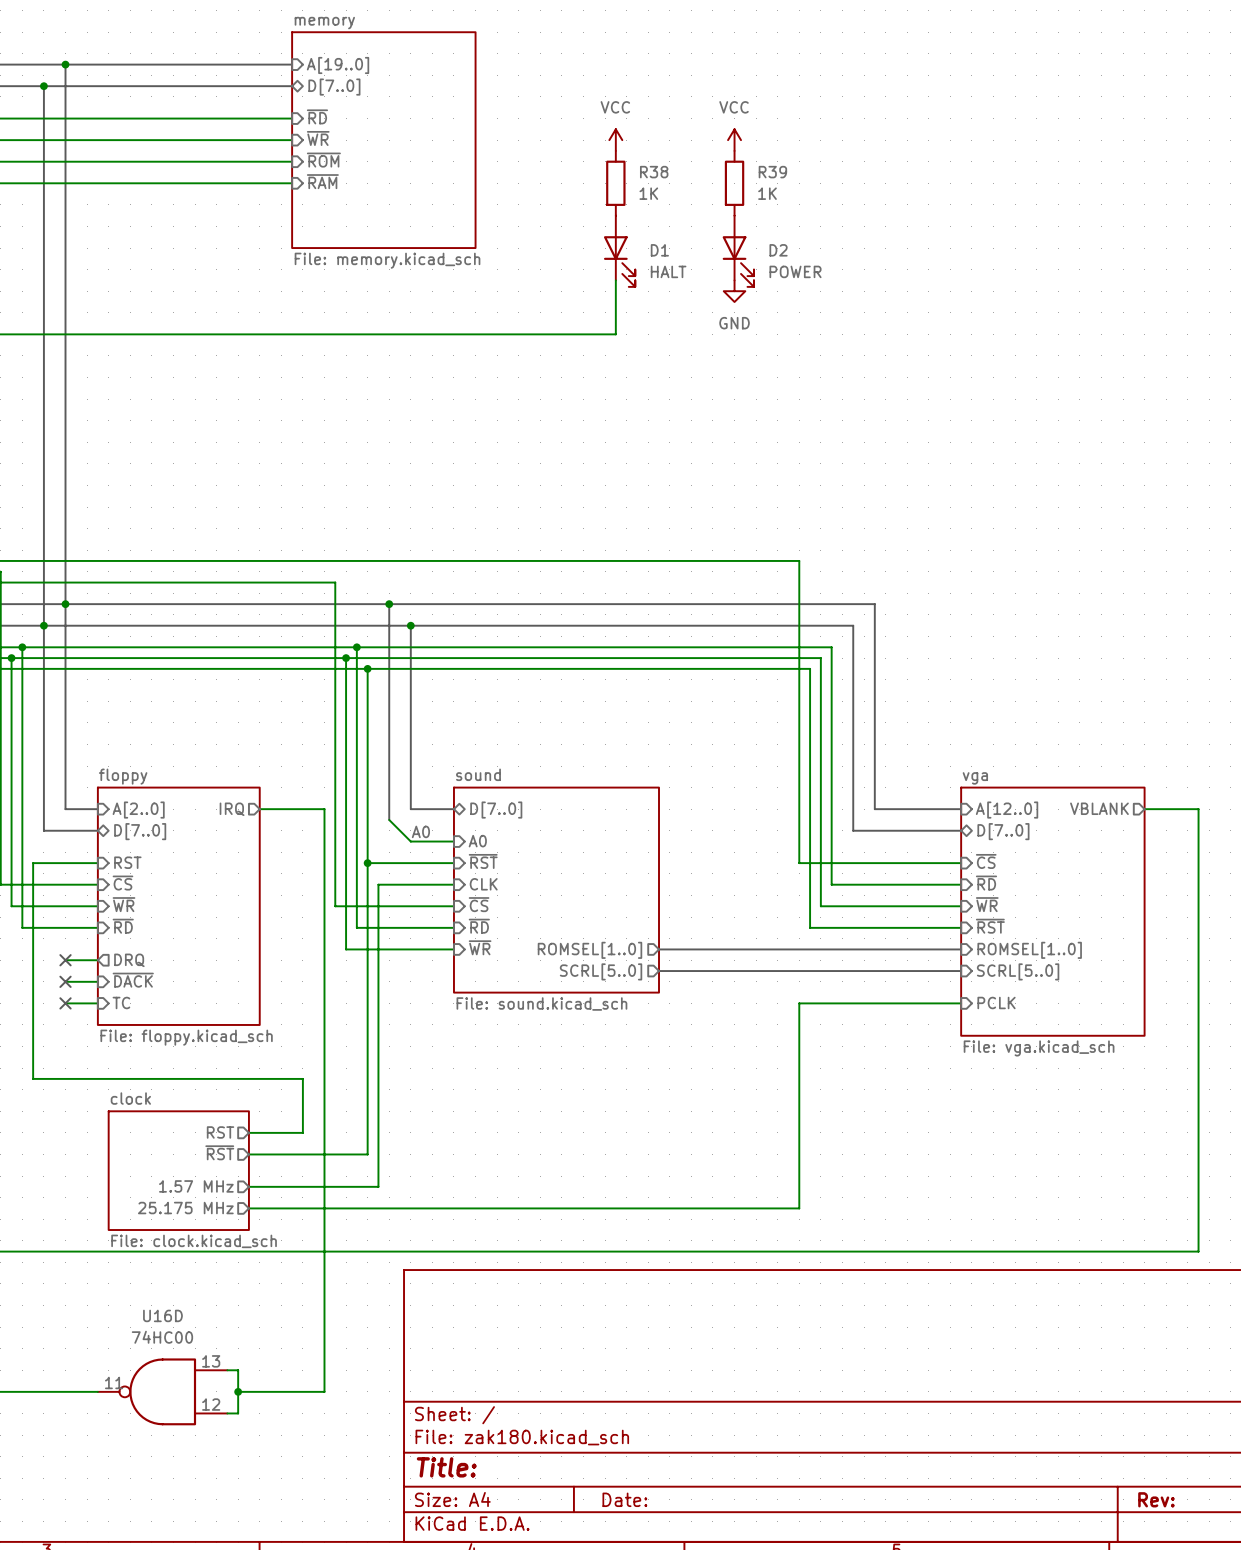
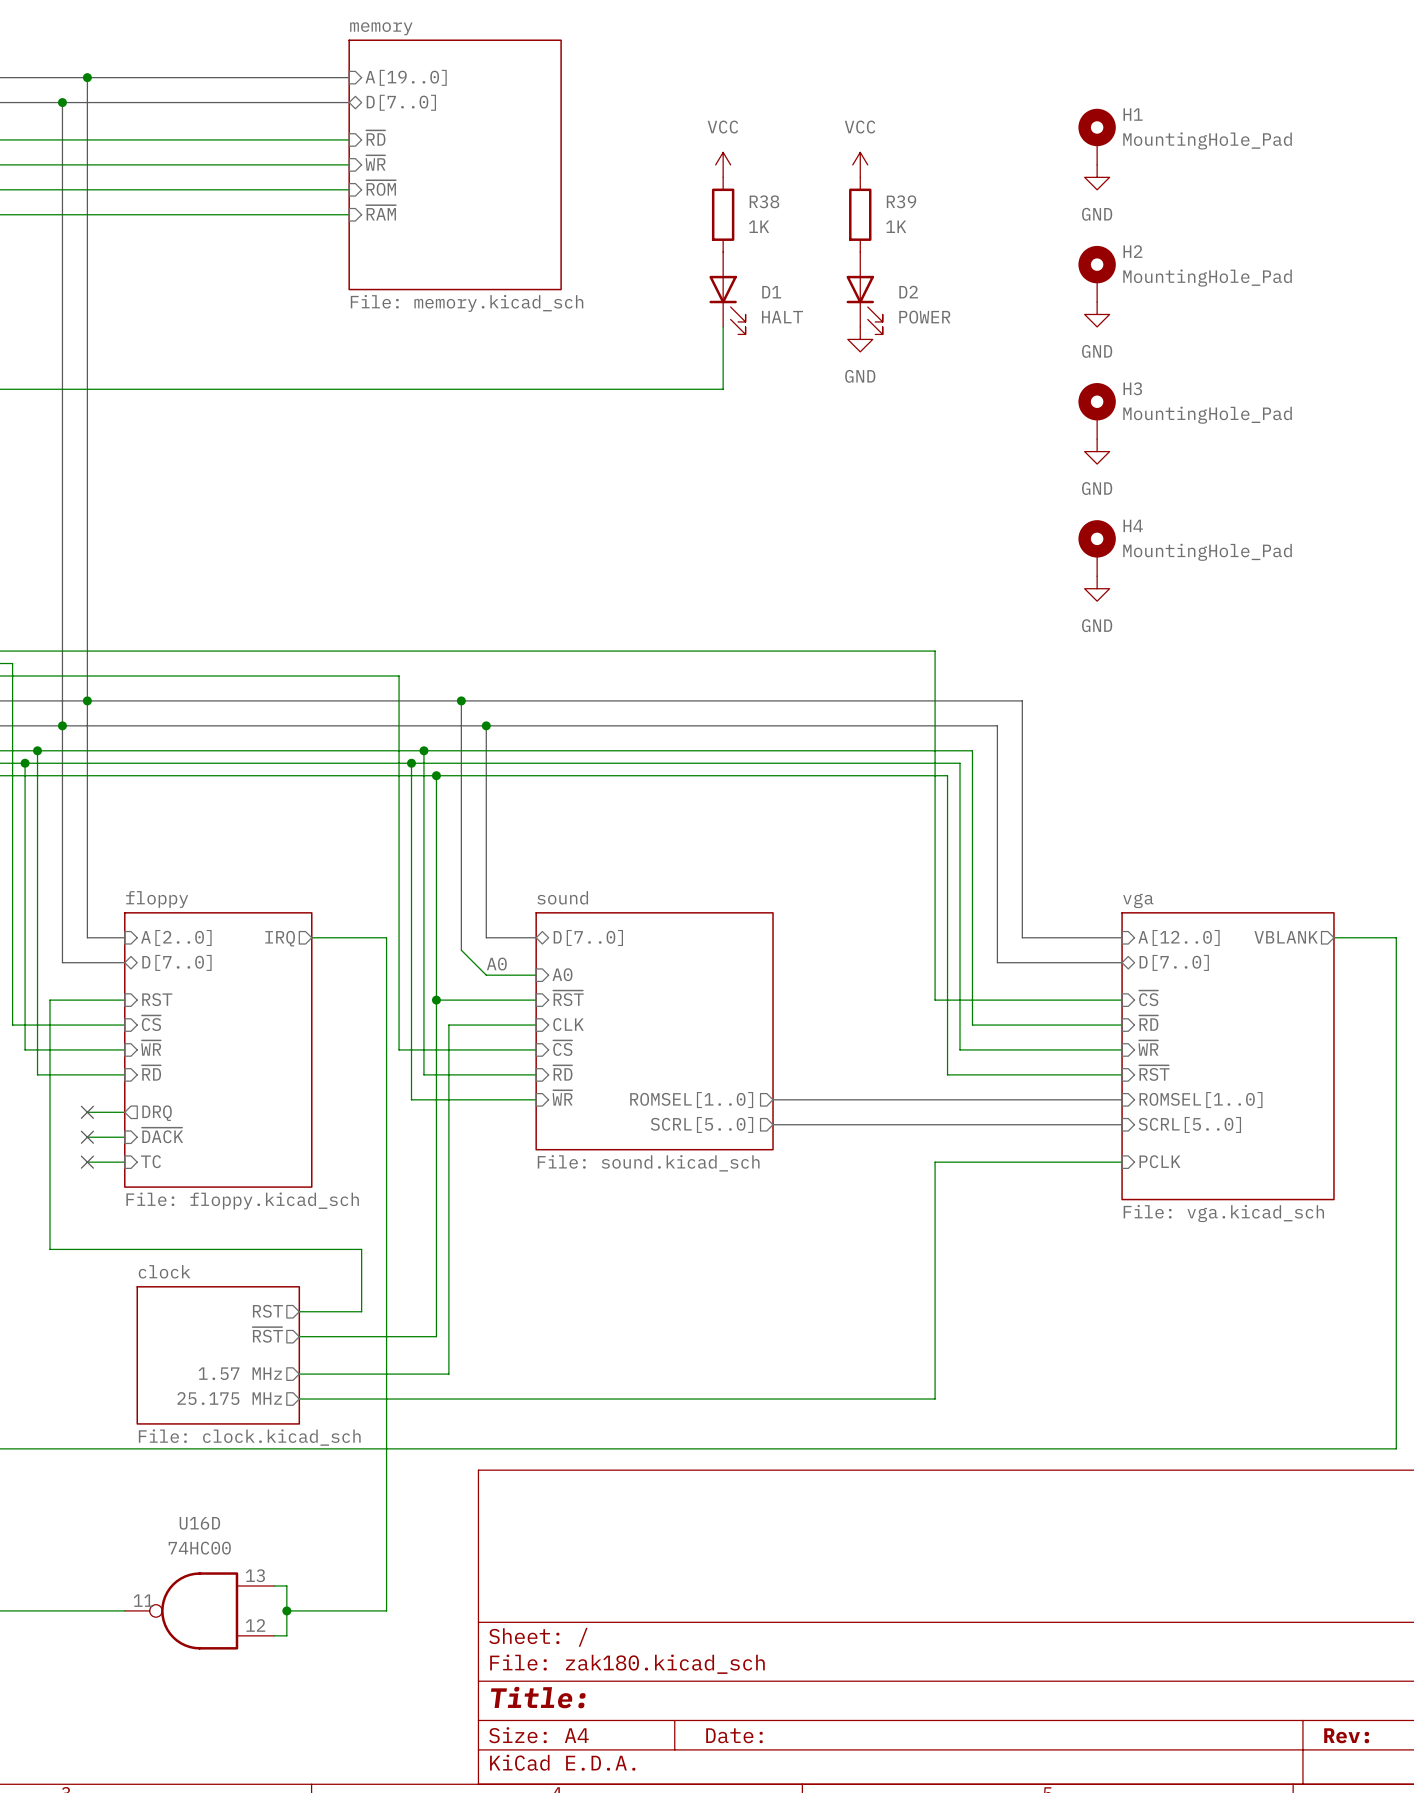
H1: none -> MountingHole_Pad (1097, 136)
power symbol: none -> GND (1097, 177)
H2: none -> MountingHole_Pad (1097, 273)
power symbol: none -> GND (1097, 314)
H3: none -> MountingHole_Pad (1097, 411)
power symbol: none -> GND (1097, 451)
H4: none -> MountingHole_Pad (1097, 548)
power symbol: none -> GND (1097, 588)

